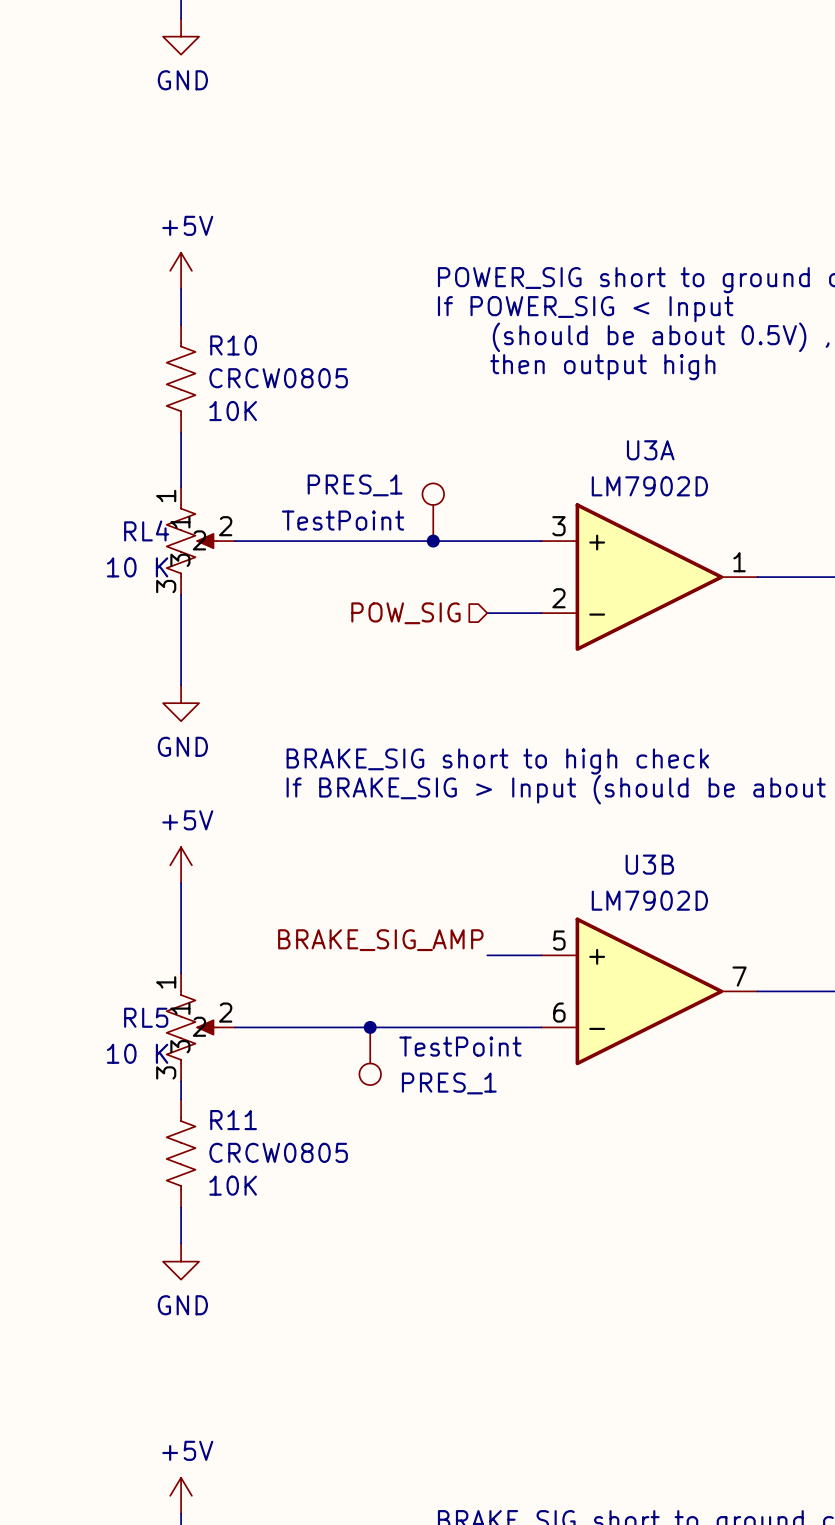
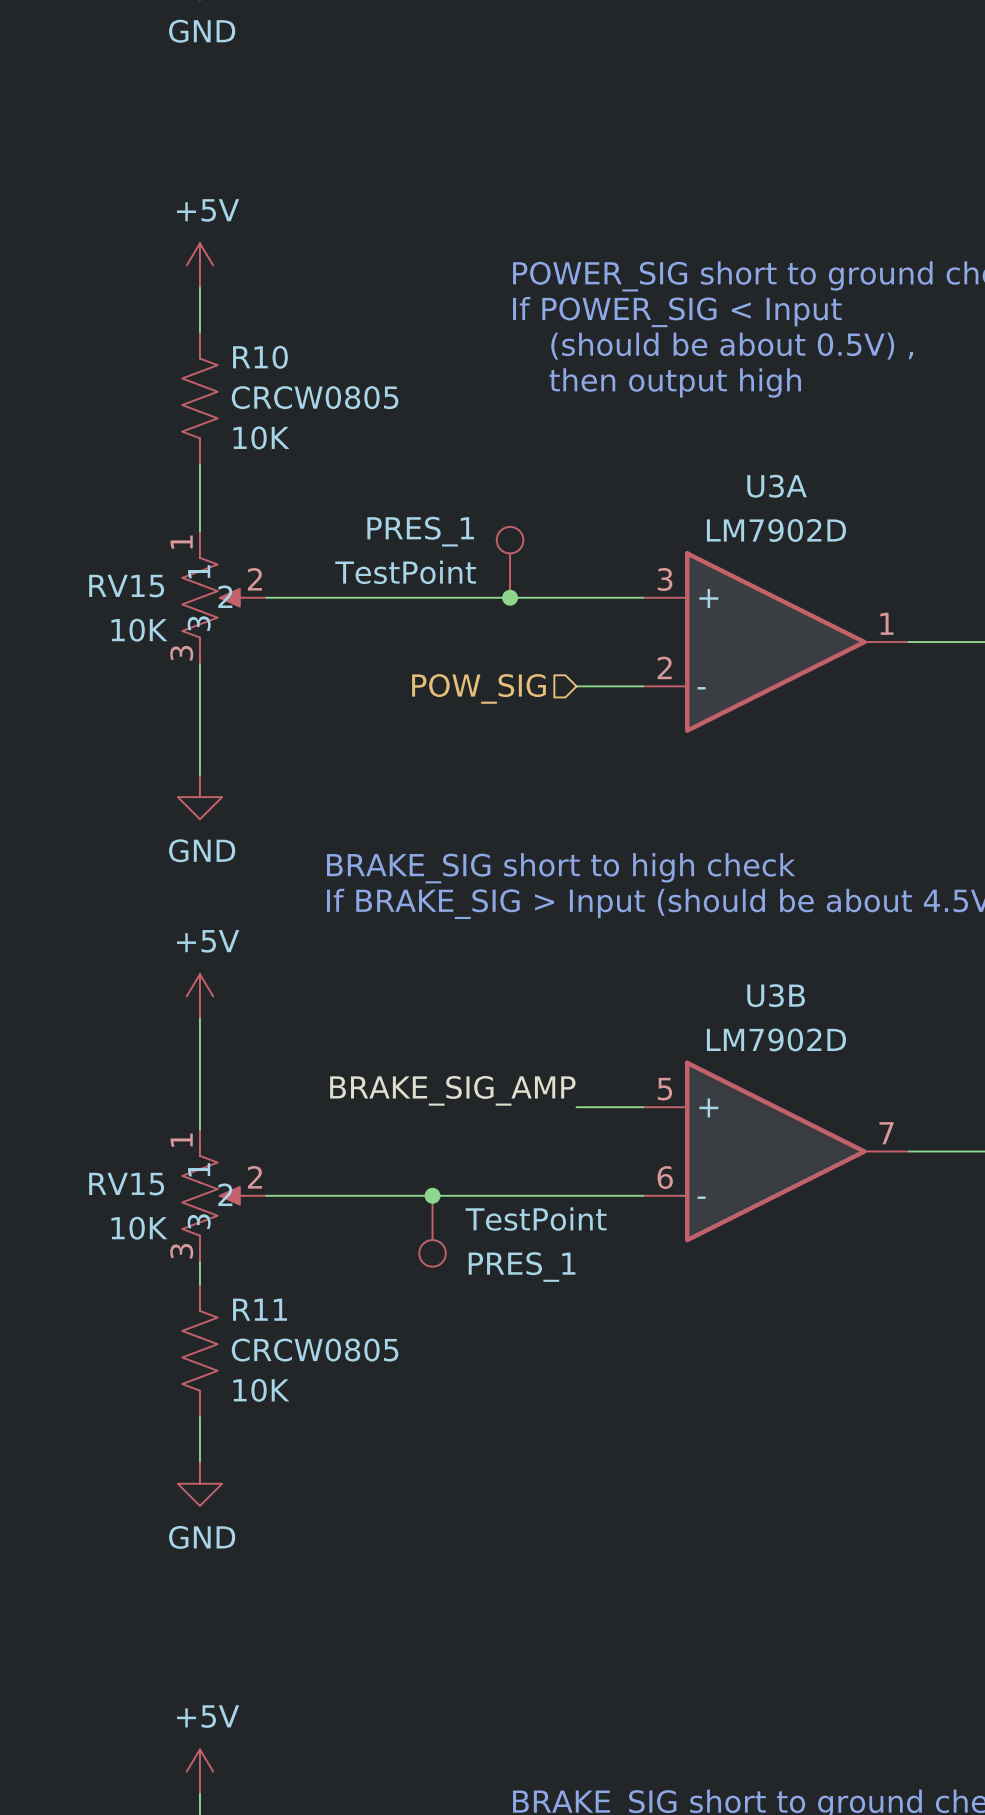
RL4 name: RL4 (146, 530) -> RV15 (126, 586)
RL4 value: 10 K (137, 567) -> 10K (139, 630)
RL5 name: RL5 (146, 1017) -> RV15 (126, 1184)
RL5 value: 10 K (137, 1053) -> 10K (139, 1228)

